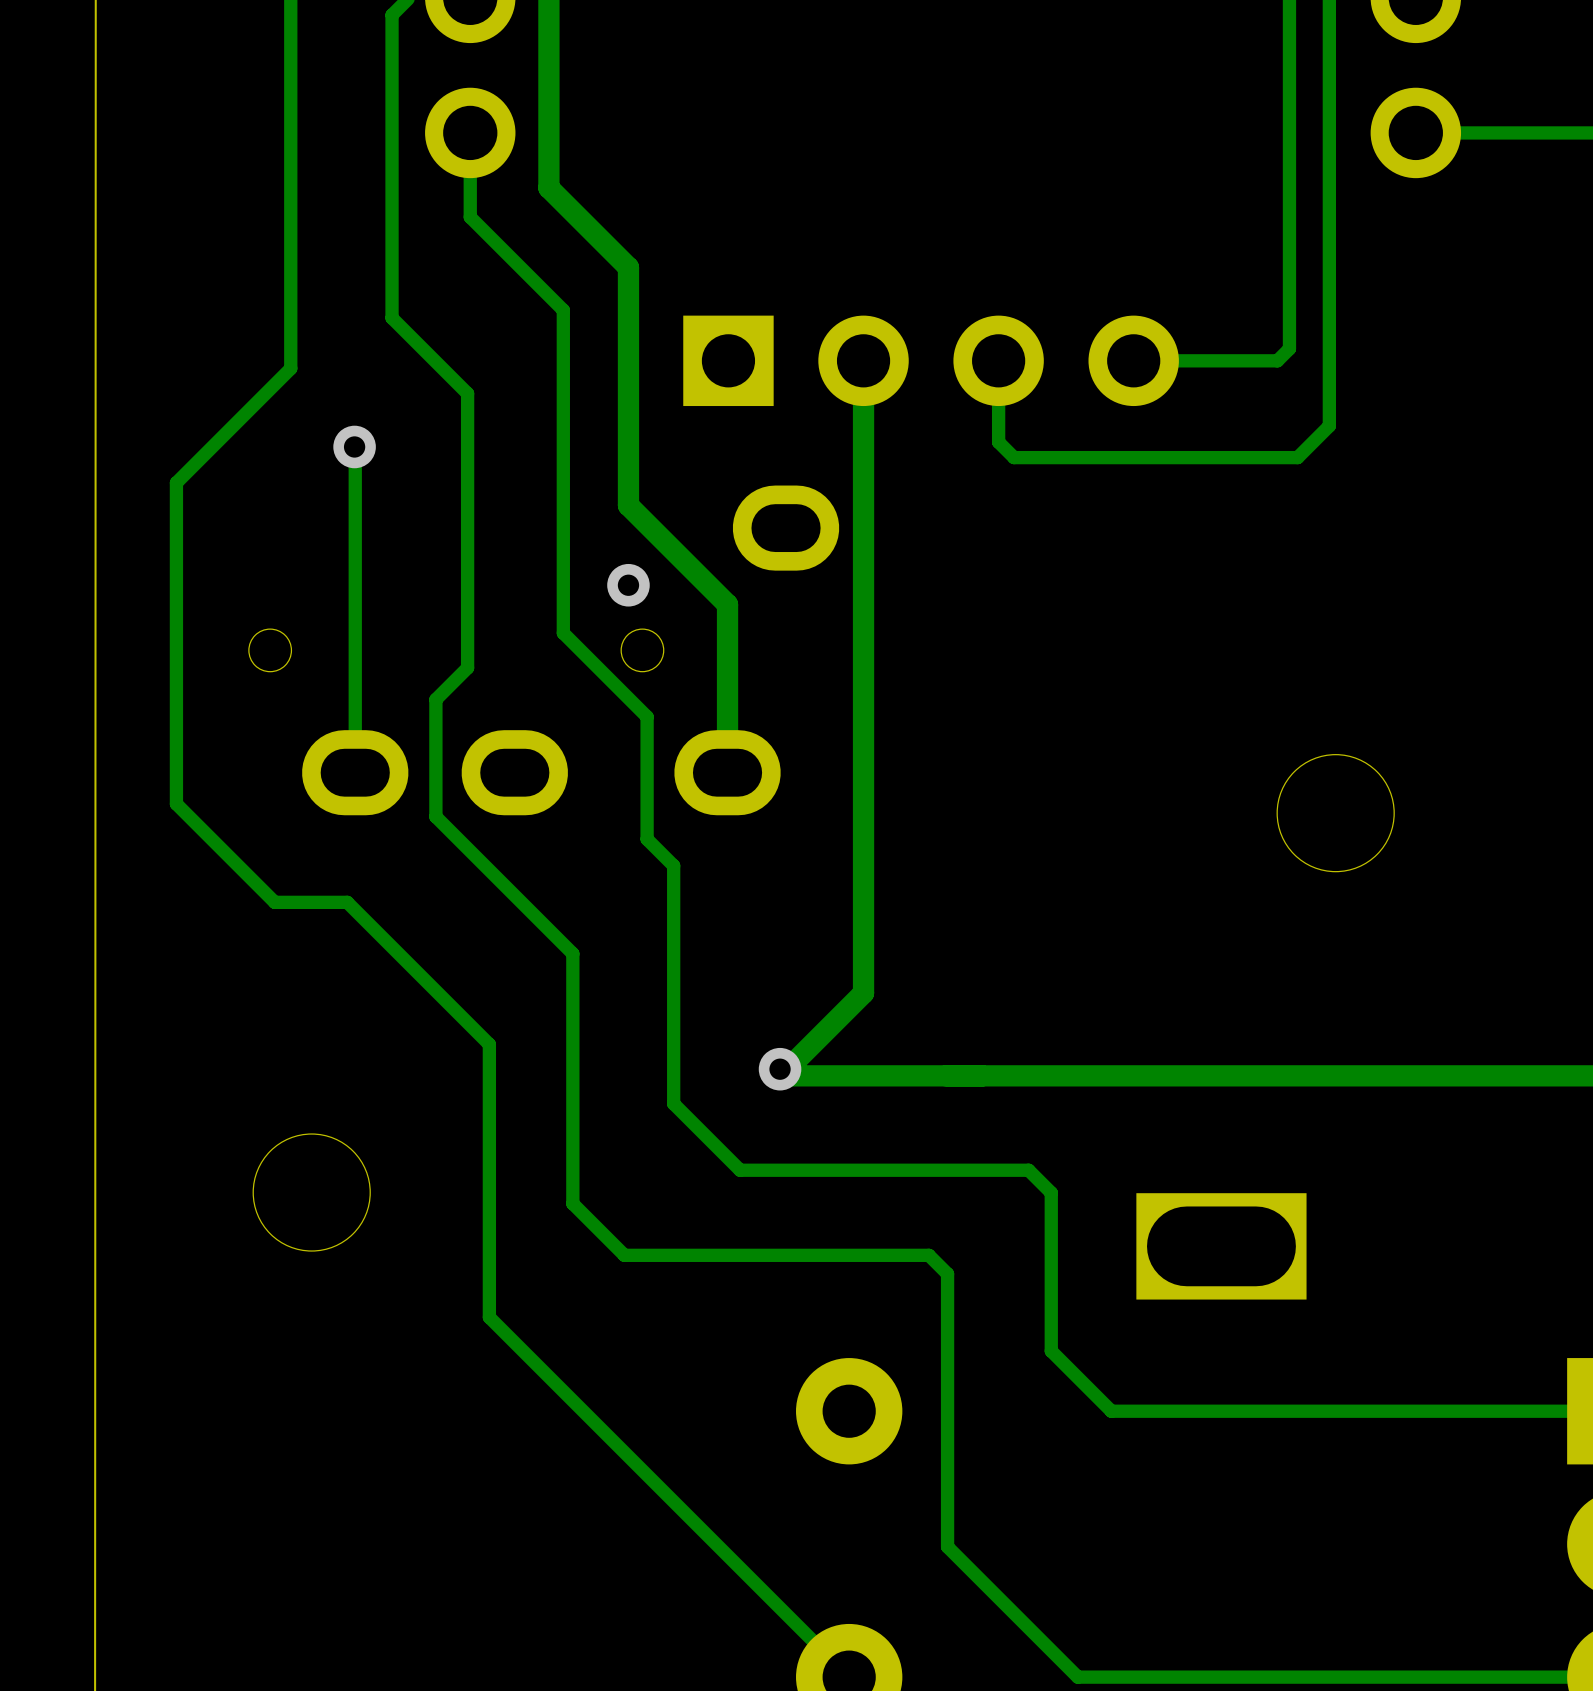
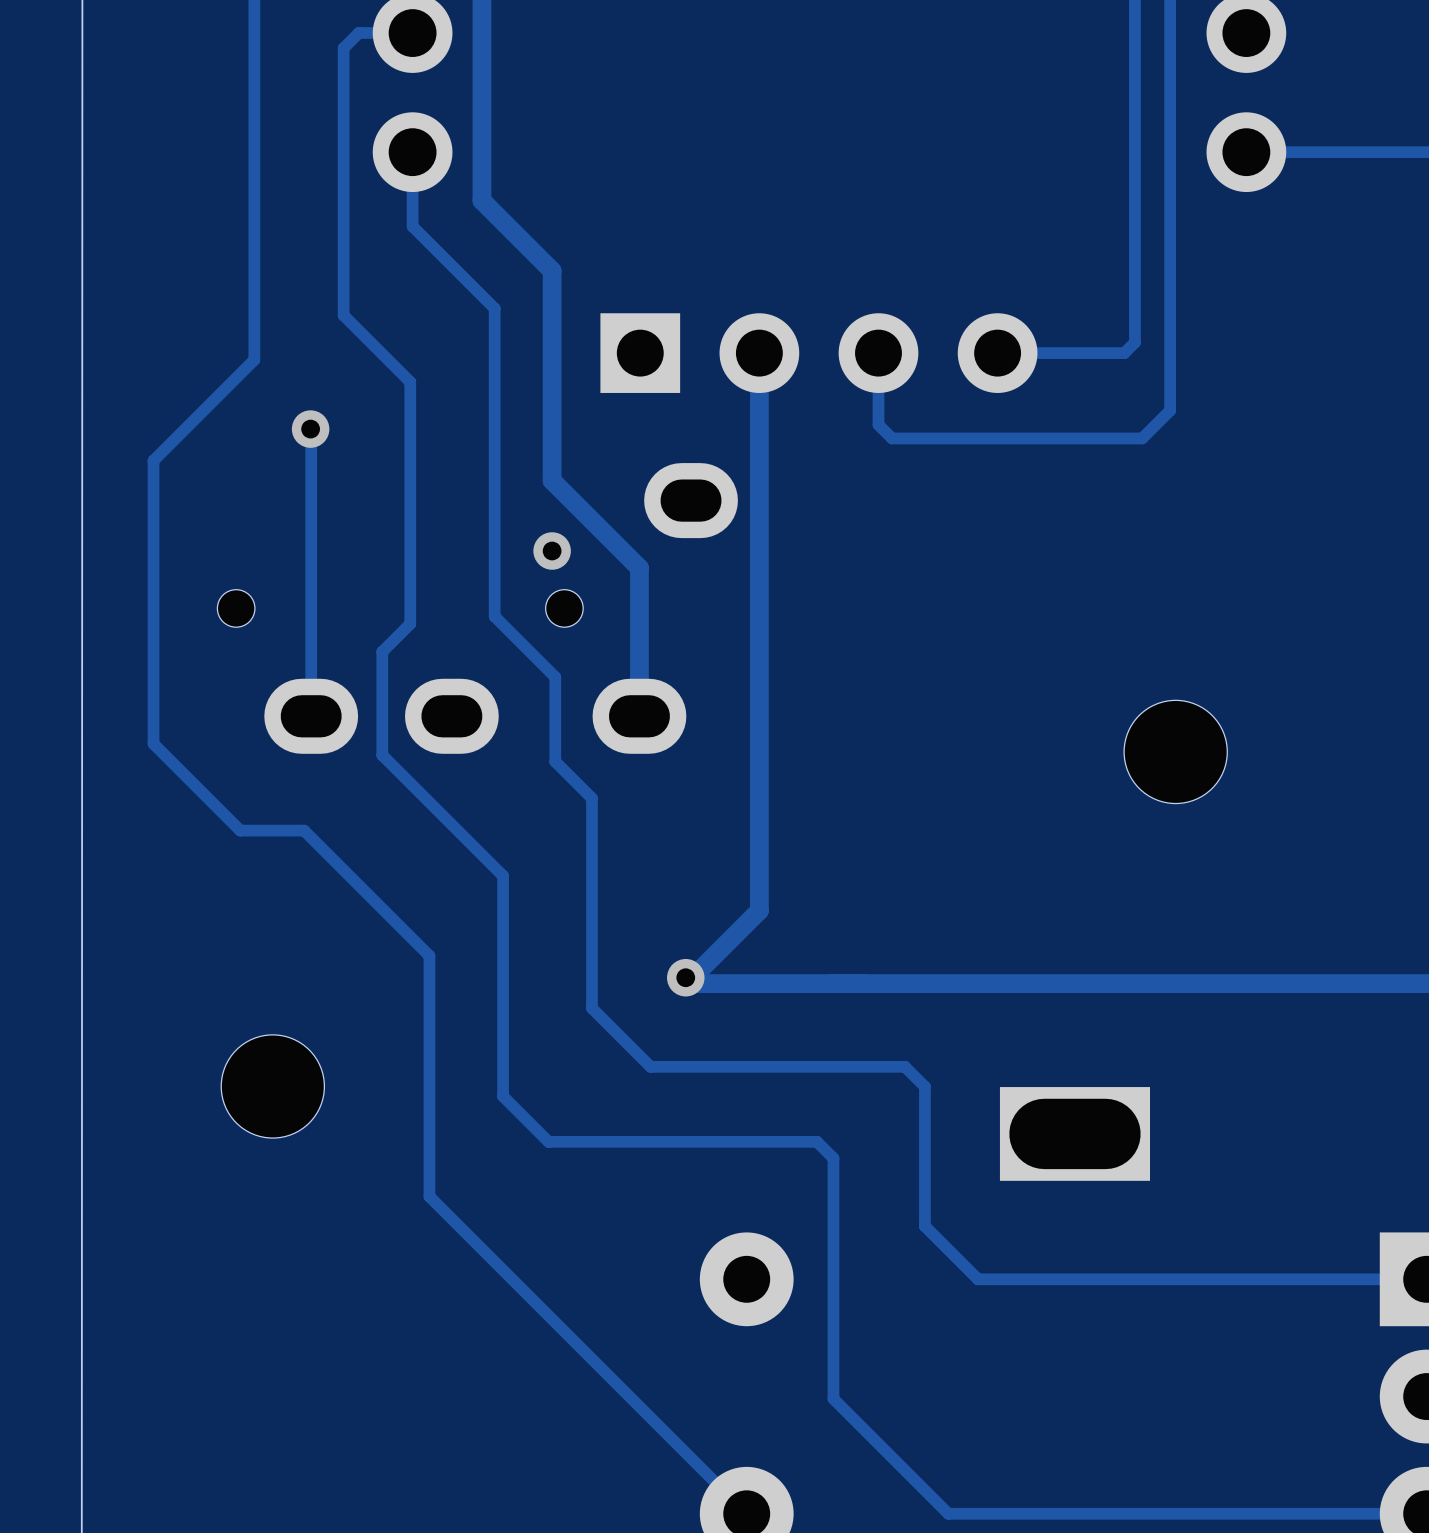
track: (563, 633) (647, 716) (647, 839) -> (494, 593) (494, 616) (555, 677) (555, 761) (568, 774)

